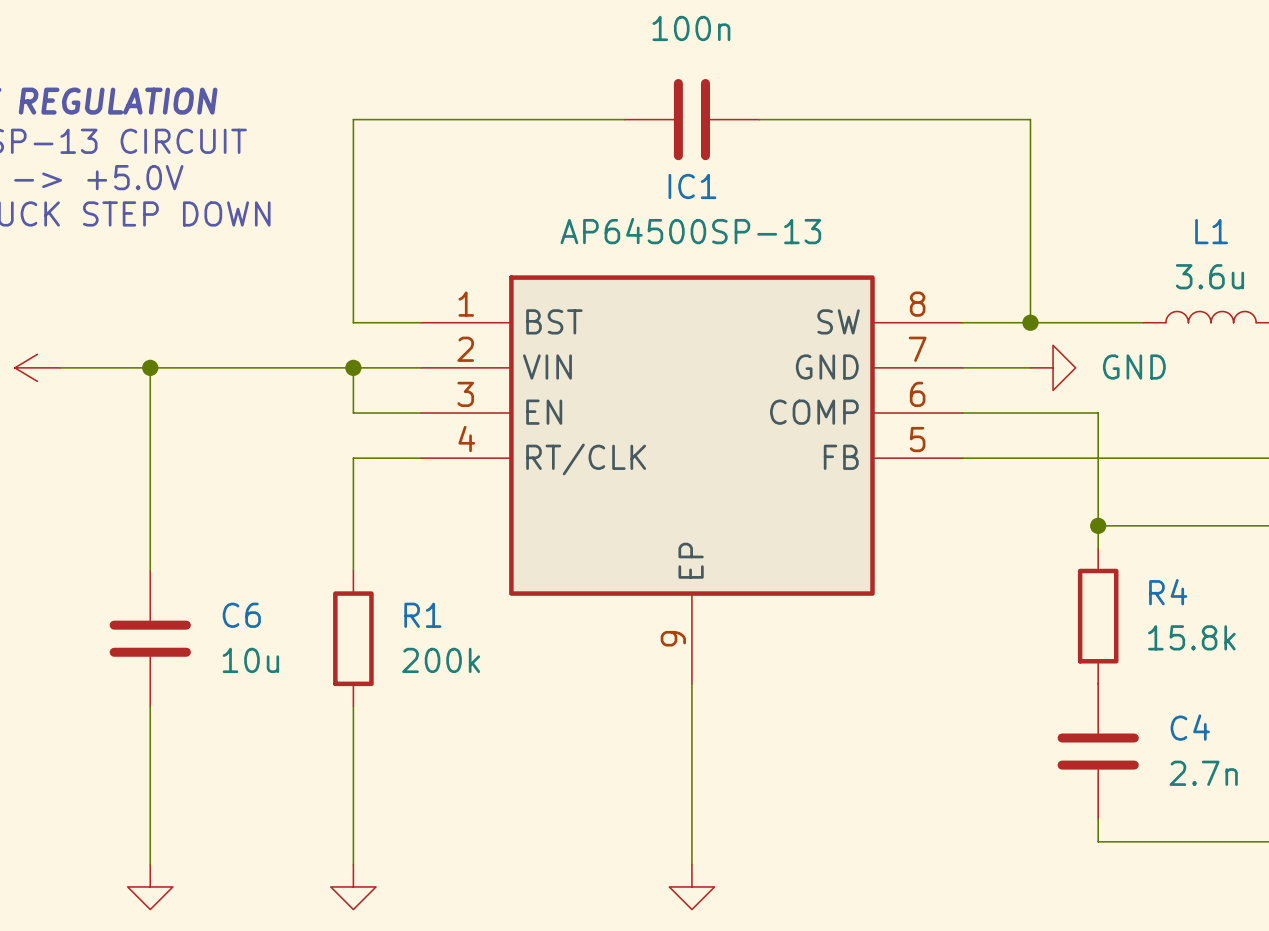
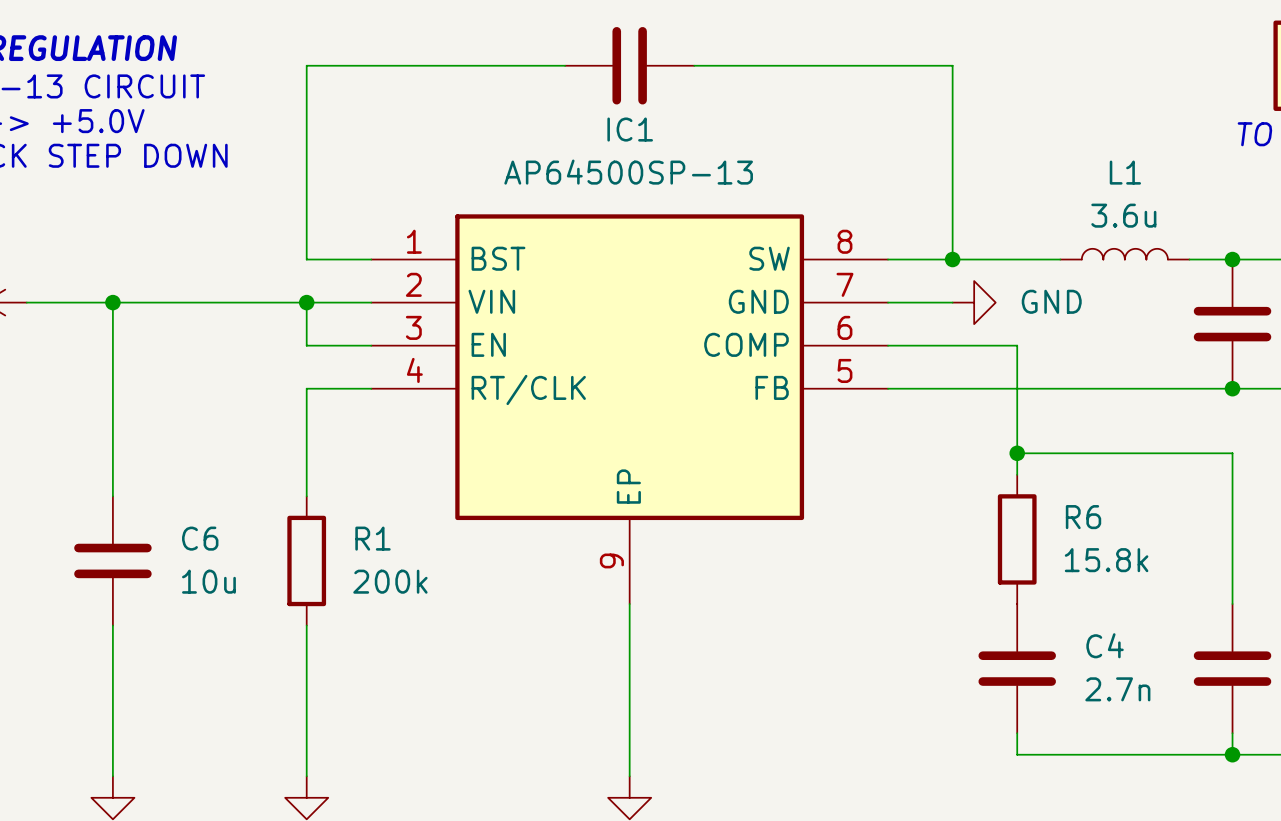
R4 name: R4 (1168, 592) -> R6 (1083, 517)

